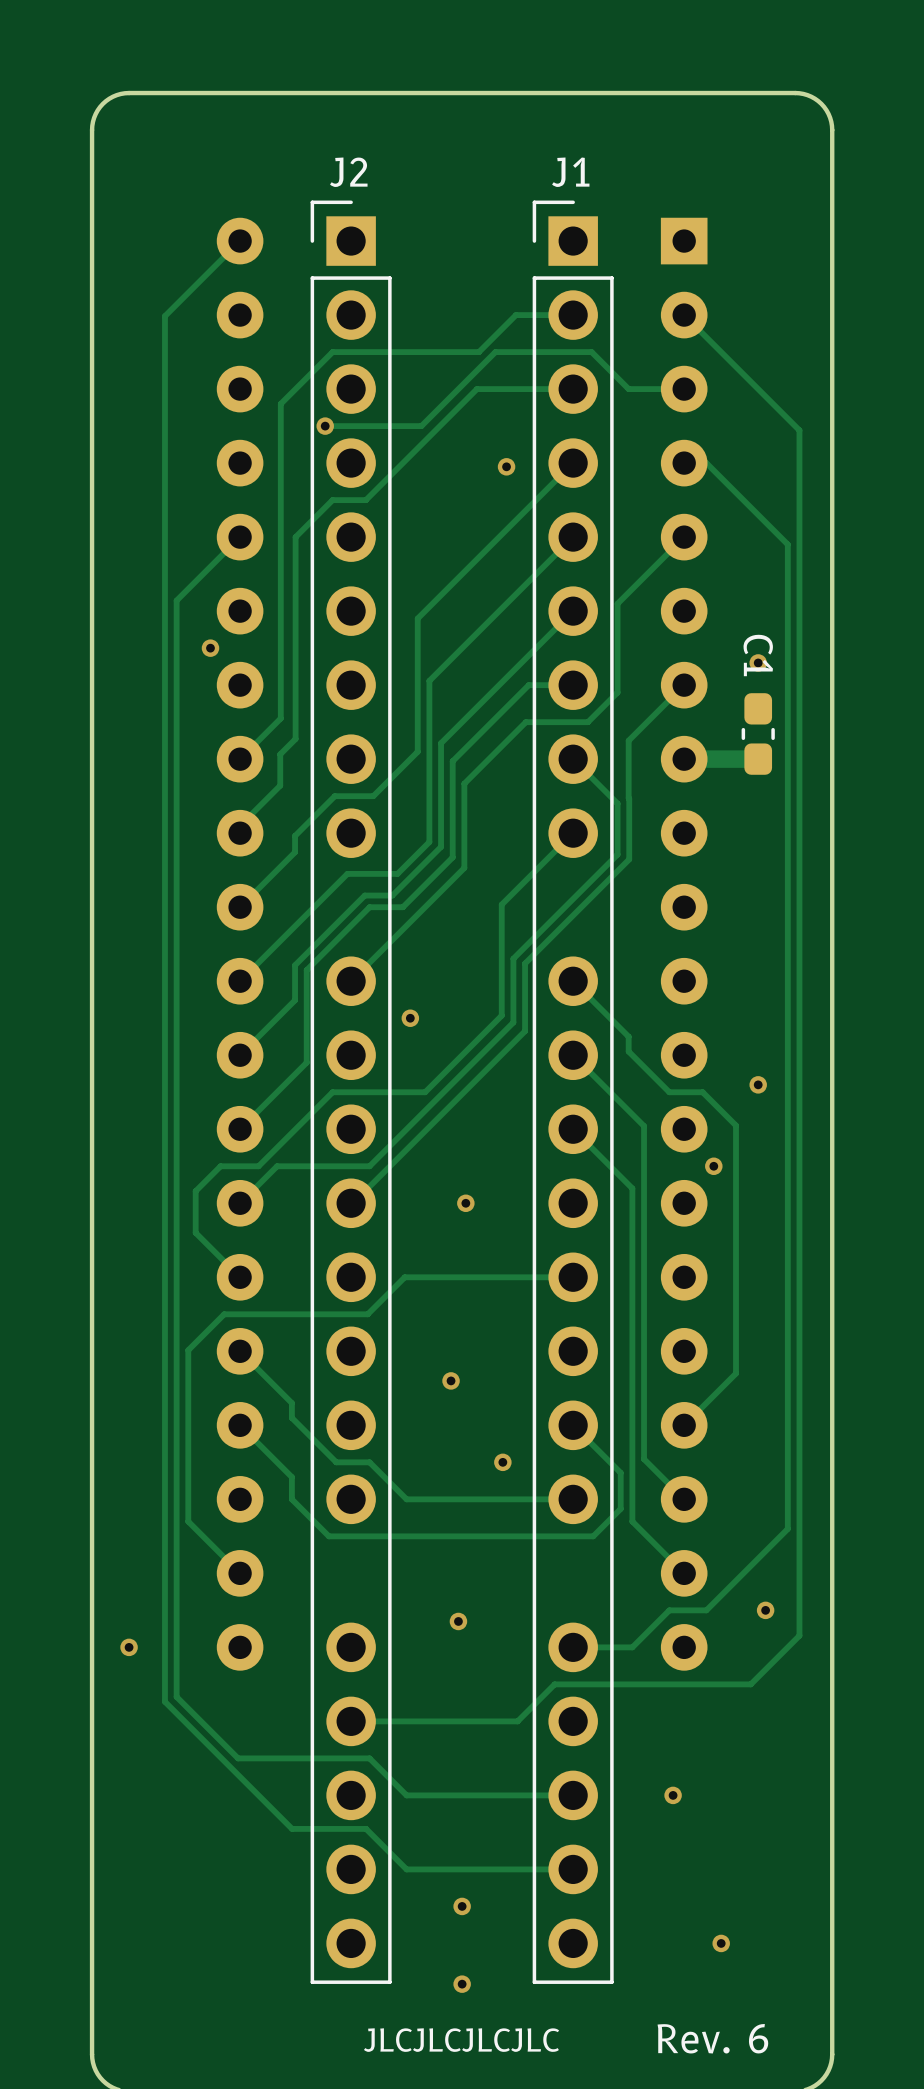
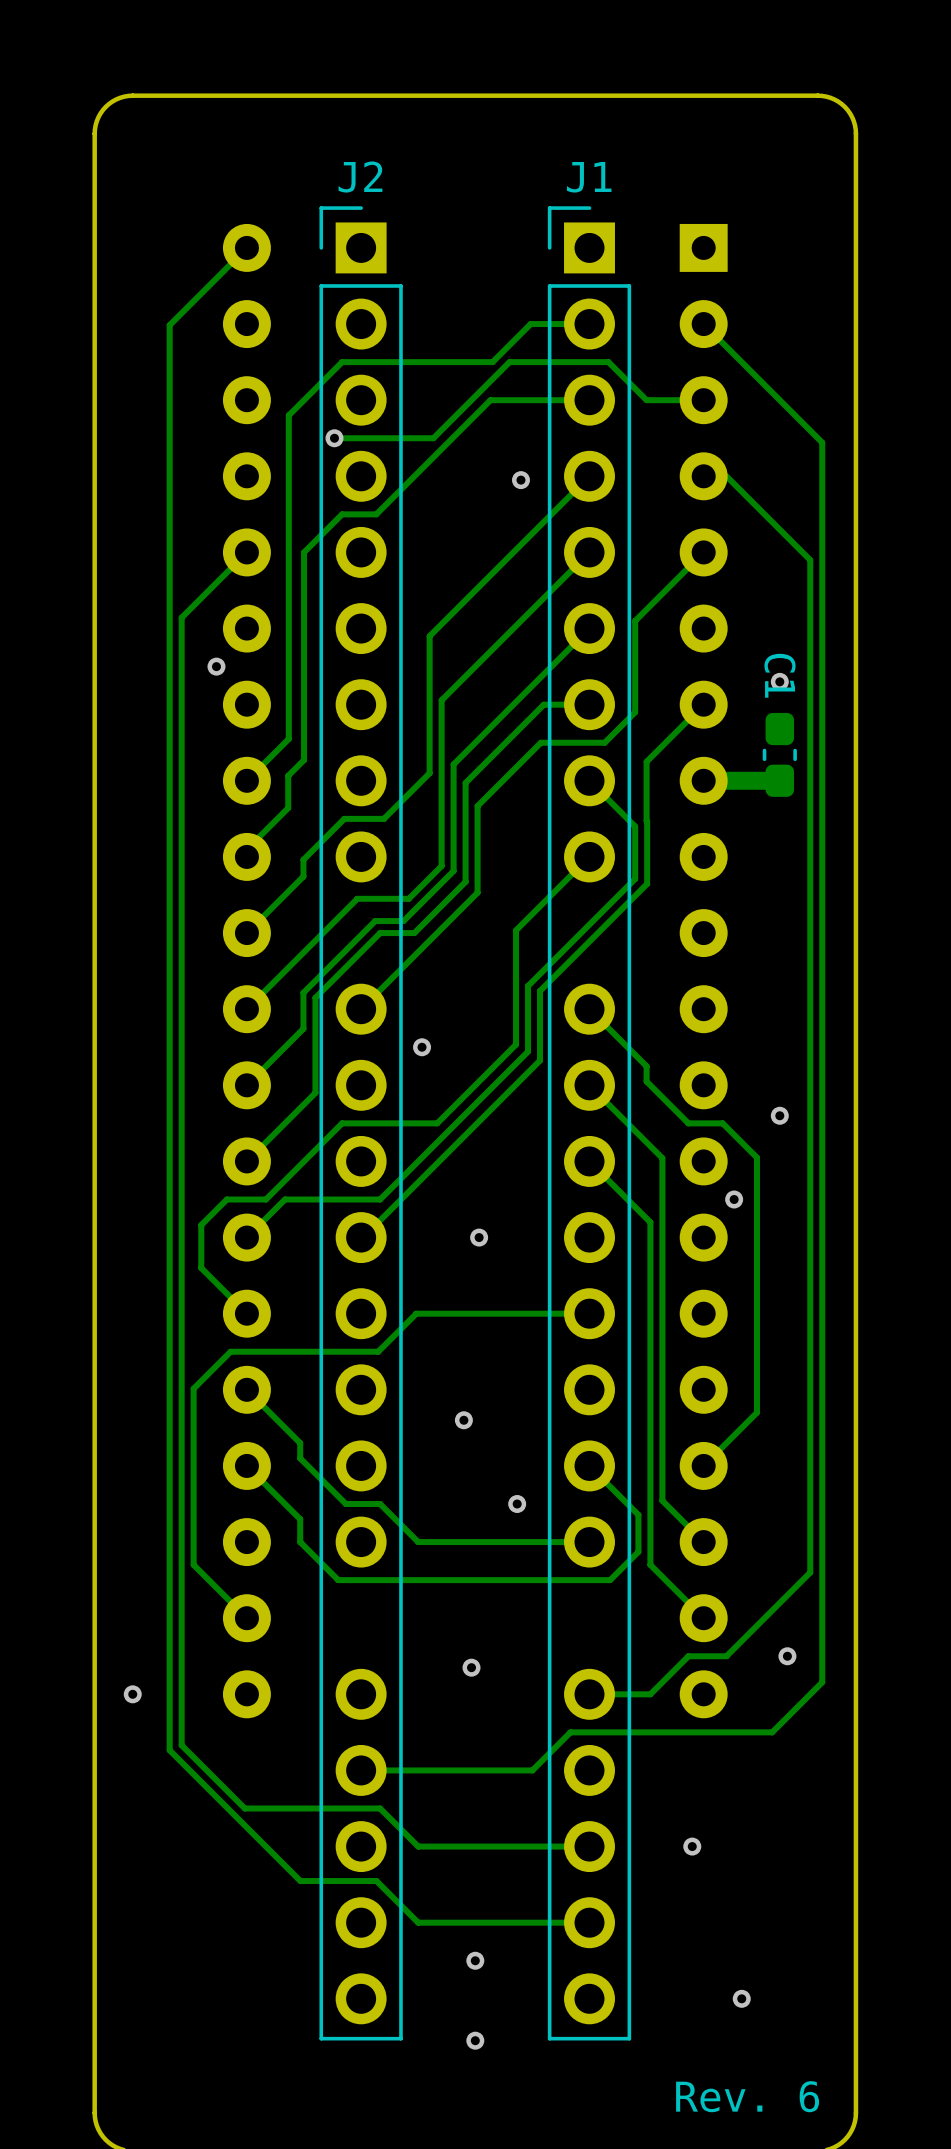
text: JLCJLCJLCJLC (461, 2040) -> none

